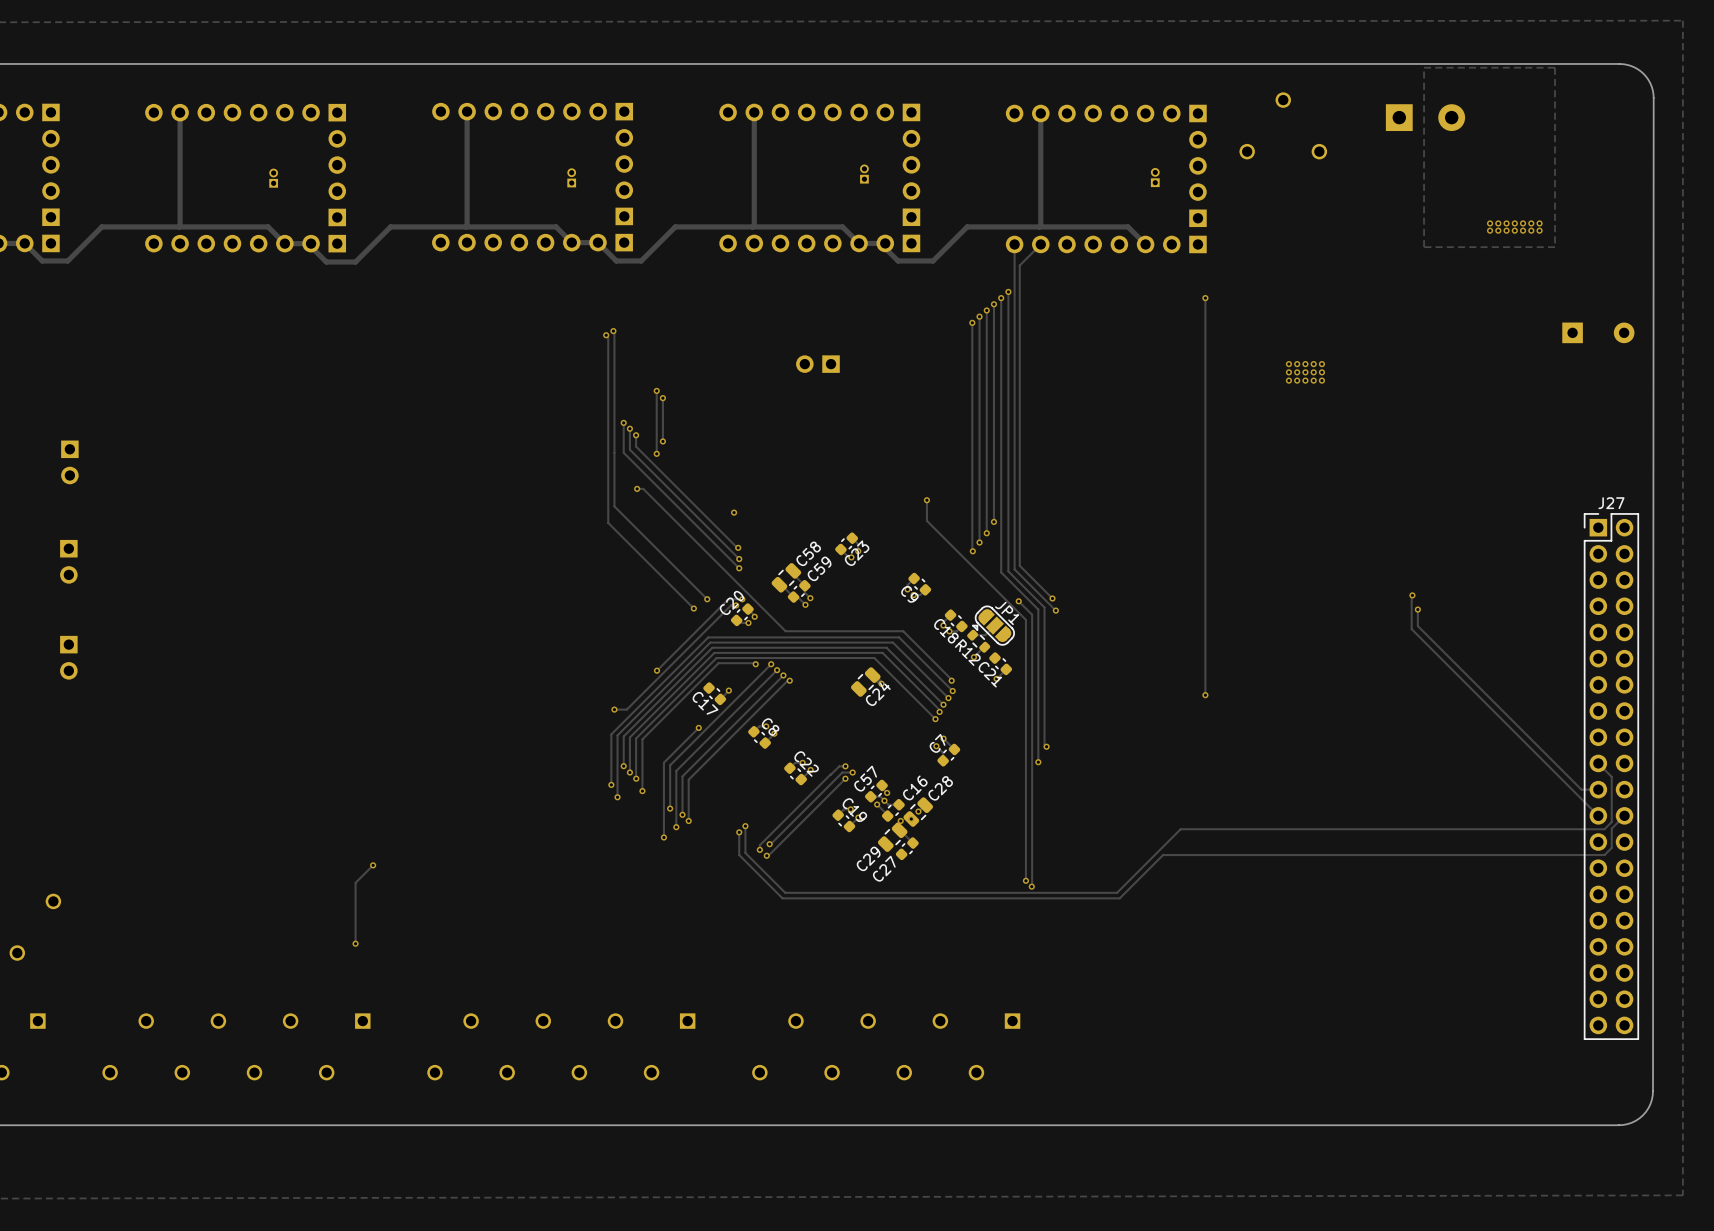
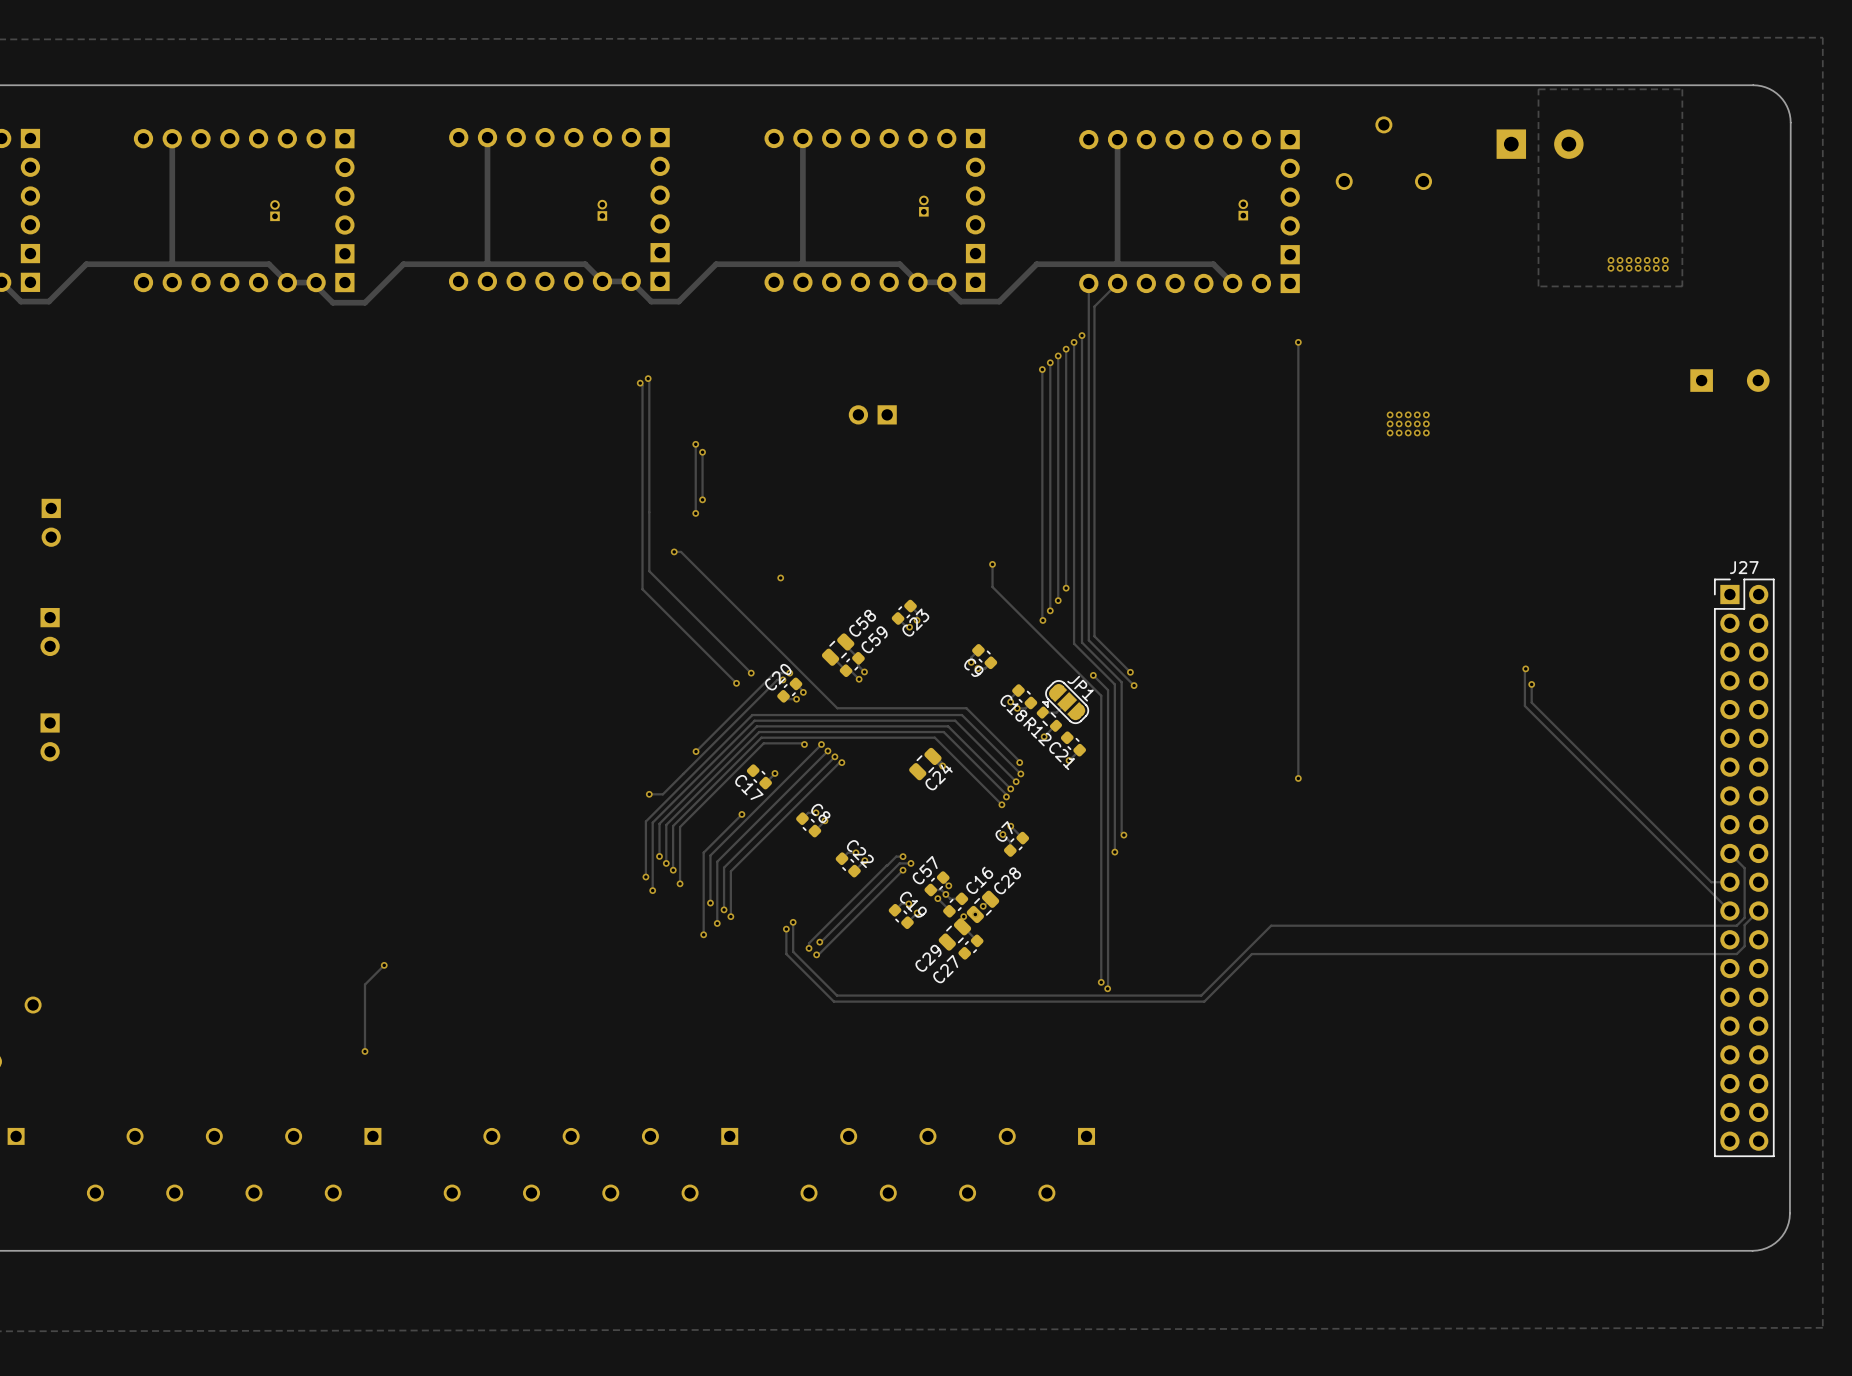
track: (623, 422) (623, 452) (739, 568) -> none
via: (623, 422) -> none
track: (629, 428) (629, 449) (739, 559) -> none
via: (629, 428) -> none
track: (636, 435) (636, 446) (738, 547) -> none
via: (636, 435) -> none
via: (738, 547) -> none
via: (739, 559) -> none
via: (739, 568) -> none

